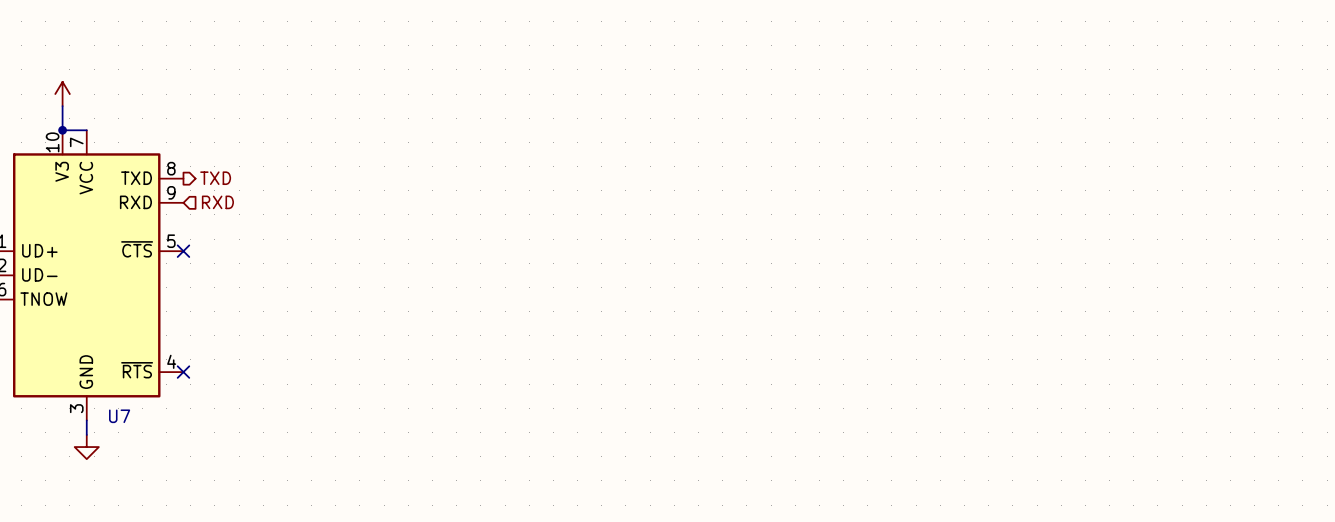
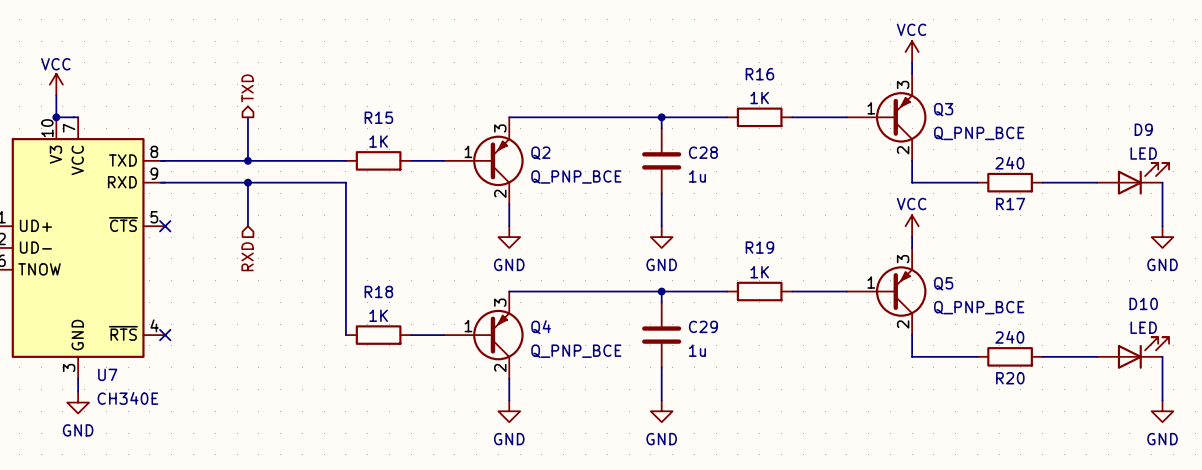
power symbol: none -> VCC (912, 52)
wire: none -> (912, 62) (912, 73)
power symbol text: none -> VCC (55, 64)
wire: none -> (247, 117) (247, 160)
wire: none -> (509, 117) (727, 117)
wire: none -> (661, 117) (661, 128)
junction: none -> (661, 117)
R16: none -> 1K (759, 117)
wire: none -> (792, 117) (846, 117)
Q3: none -> Q_PNP_BCE (886, 117)
wire: none -> (160, 160) (345, 160)
hierarchical label rotation: 0° (215, 178) -> 90° counterclockwise (247, 88)
hierarchical label position: TXD (215, 178) -> TXD (247, 88)
junction: none -> (247, 160)
R15: none -> 1K (378, 160)
wire: none -> (411, 160) (443, 160)
Q2: none -> Q_PNP_BCE (483, 160)
C28: none -> 1u (661, 160)
wire: none -> (912, 160) (912, 182) (977, 182)
D9: none -> LED (1133, 178)
wire: none -> (160, 182) (345, 182) (345, 335)
hierarchical label rotation: 0° (217, 202) -> 90° clockwise (247, 256)
hierarchical label position: RXD (217, 202) -> RXD (247, 256)
wire: none -> (247, 182) (247, 226)
junction: none -> (247, 182)
R17: none -> 240 (1010, 182)
wire: none -> (1042, 182) (1097, 182)
wire: none -> (1162, 182) (1162, 226)
wire: none -> (661, 193) (661, 226)
wire: none -> (509, 204) (509, 226)
power symbol: none -> VCC (912, 226)
power symbol: none -> GND (509, 237)
power symbol: none -> GND (661, 237)
wire: none -> (912, 237) (912, 247)
power symbol: none -> GND (1162, 237)
wire: none -> (509, 291) (727, 291)
wire: none -> (661, 291) (661, 302)
junction: none -> (661, 291)
R19: none -> 1K (759, 291)
wire: none -> (792, 291) (846, 291)
Q5: none -> Q_PNP_BCE (886, 291)
R18: none -> 1K (378, 335)
wire: none -> (411, 335) (443, 335)
Q4: none -> Q_PNP_BCE (483, 335)
C29: none -> 1u (661, 335)
wire: none -> (912, 335) (912, 356) (977, 356)
D10: none -> LED (1133, 353)
R20: none -> 240 (1010, 356)
wire: none -> (1042, 356) (1097, 356)
wire: none -> (1162, 356) (1162, 400)
wire: none -> (661, 367) (661, 400)
wire: none -> (509, 378) (509, 400)
U7 value: none -> CH340E (127, 398)
power symbol: none -> GND (509, 411)
power symbol: none -> GND (661, 411)
power symbol: none -> GND (1162, 411)
power symbol text: none -> GND (78, 430)

